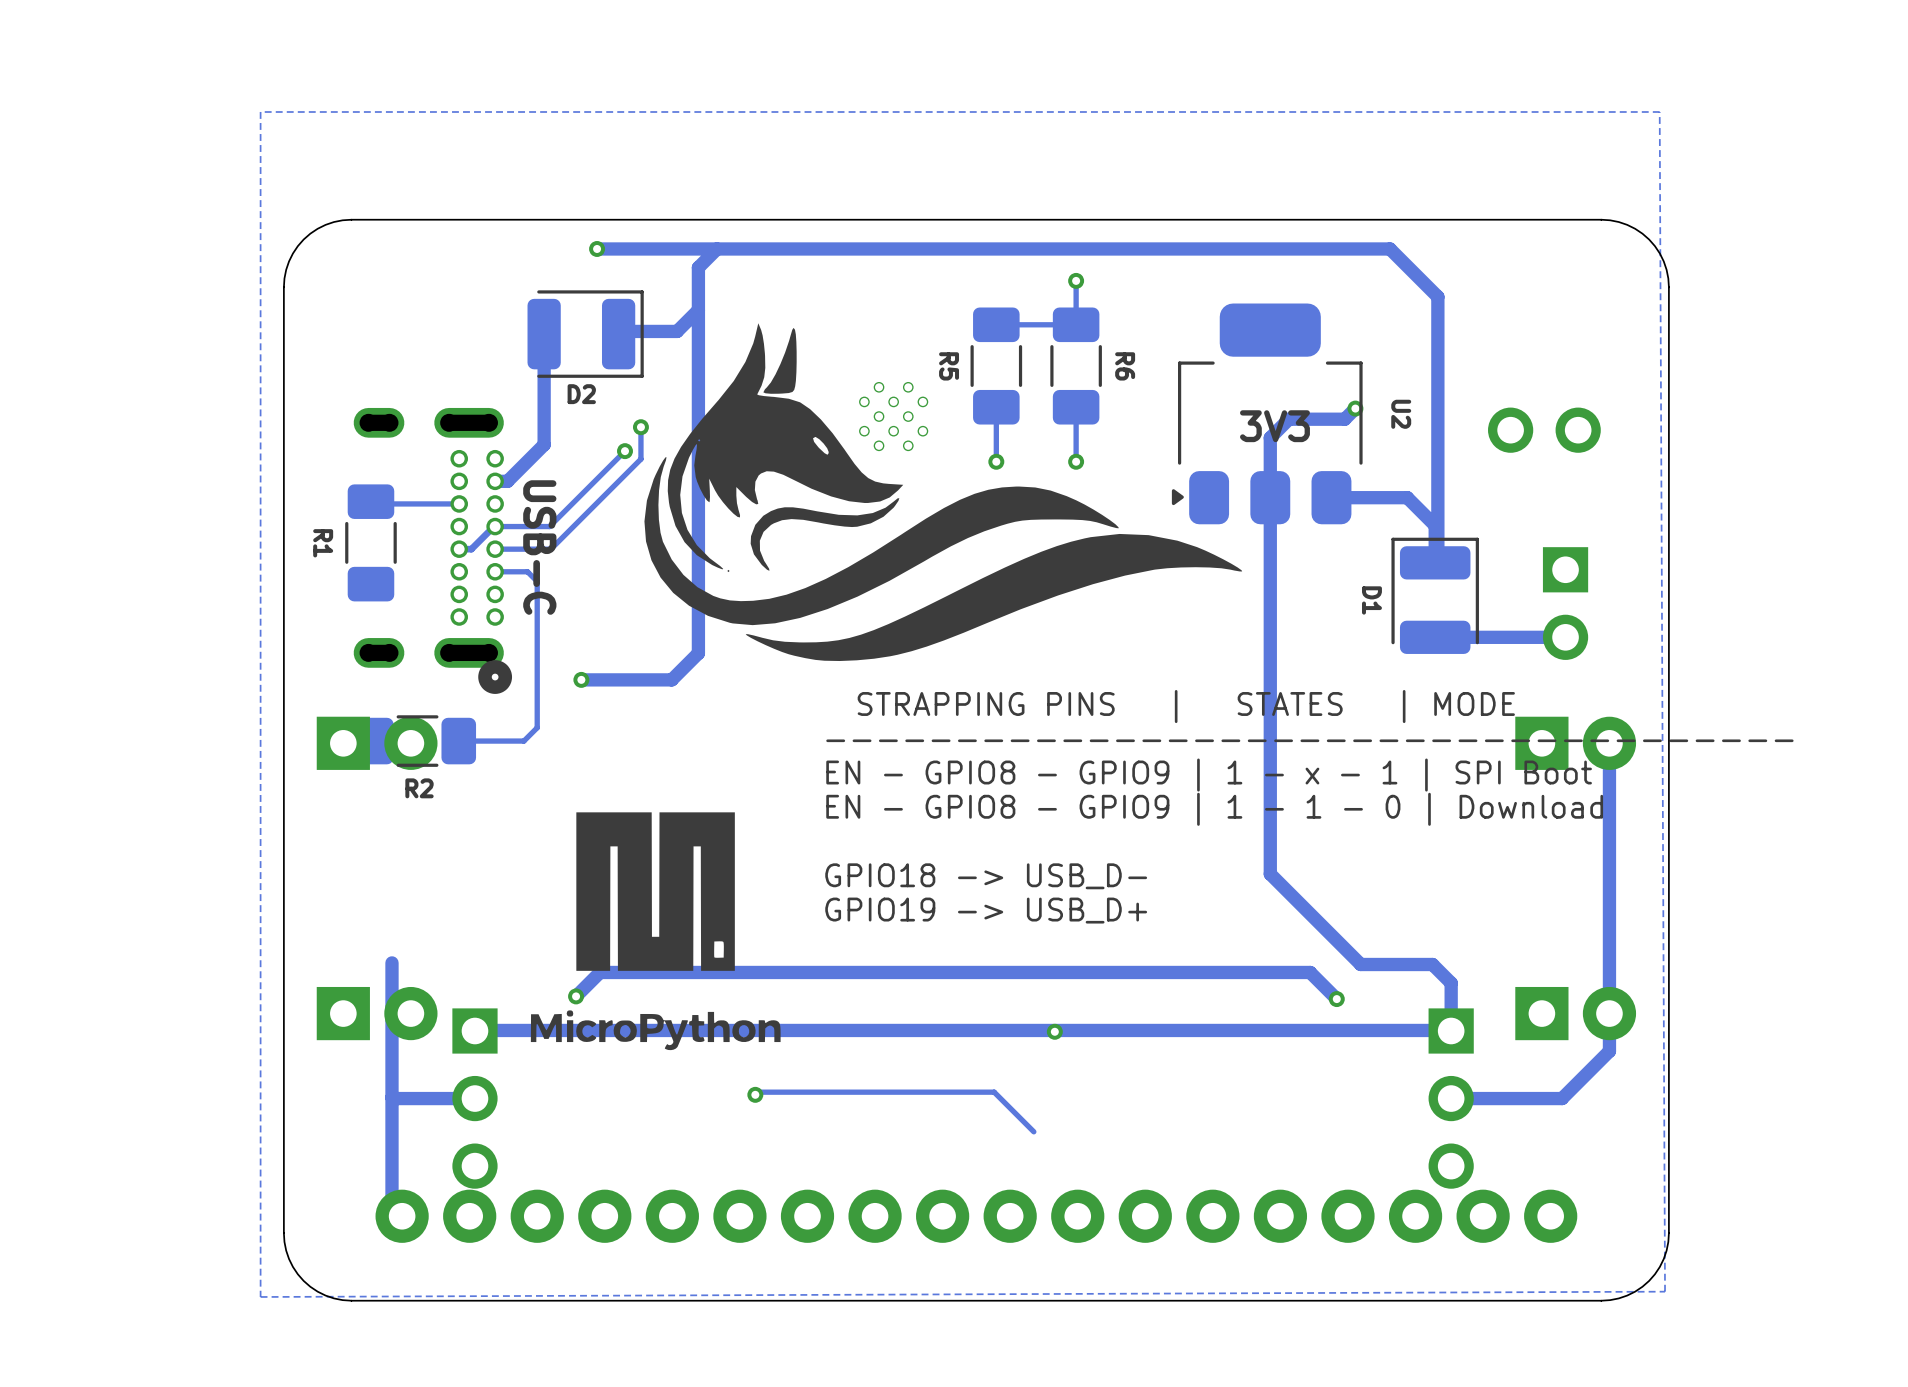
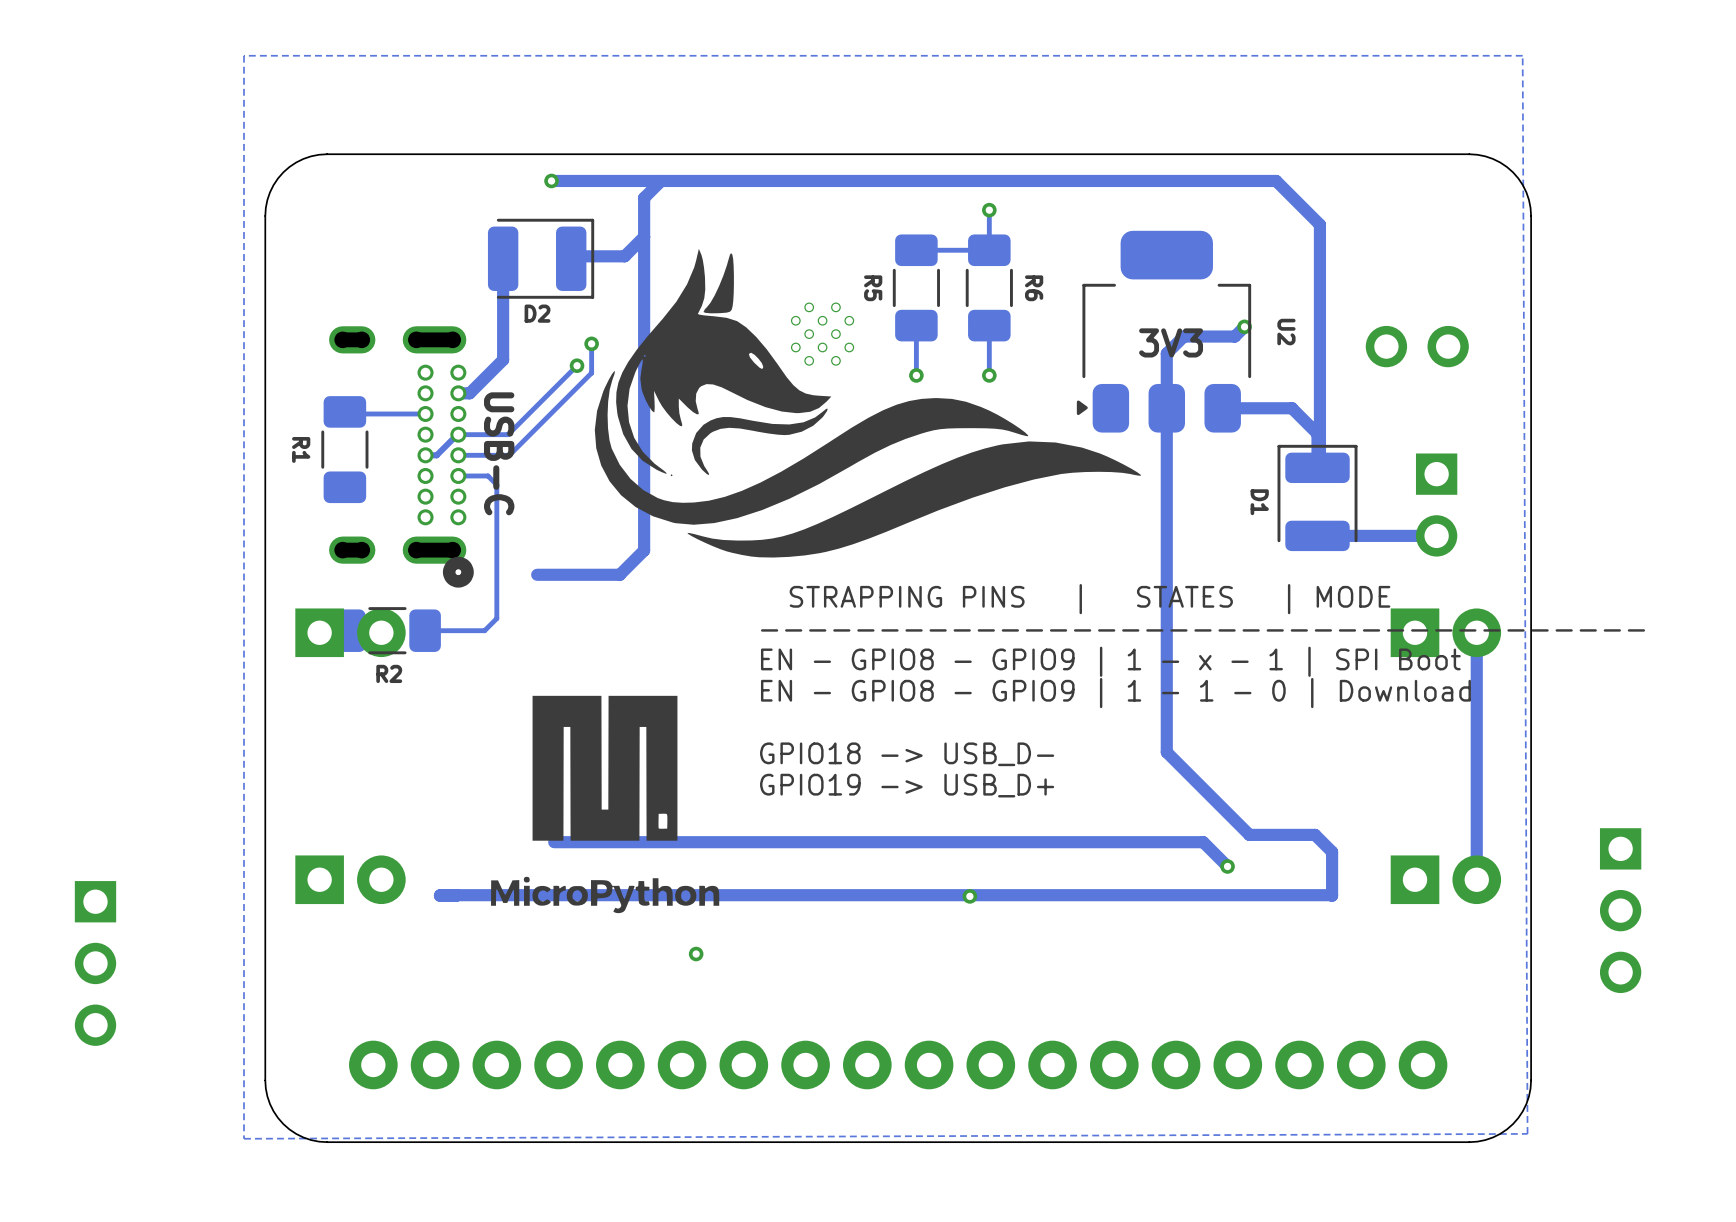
via: (581, 679) -> none
track: (391, 962) (391, 1233) -> none
track: (599, 972) (576, 996) -> none
via: (576, 996) -> none
track: (1609, 1013) (1609, 1051) (1562, 1098) (1451, 1098) (1461, 1087) -> none
track: (755, 1094) (757, 1092) (994, 1092) (1033, 1131) -> none
track: (391, 1097) (474, 1098) -> none
part position: (474, 1098) -> (95, 963)
part position: (1451, 1098) -> (1620, 910)

